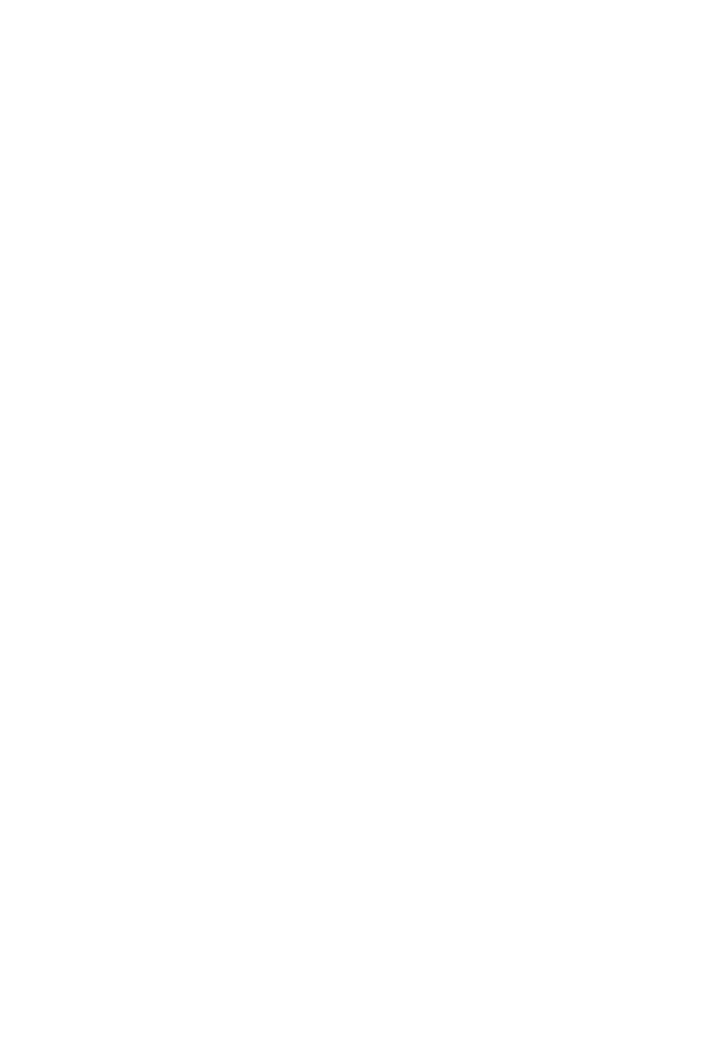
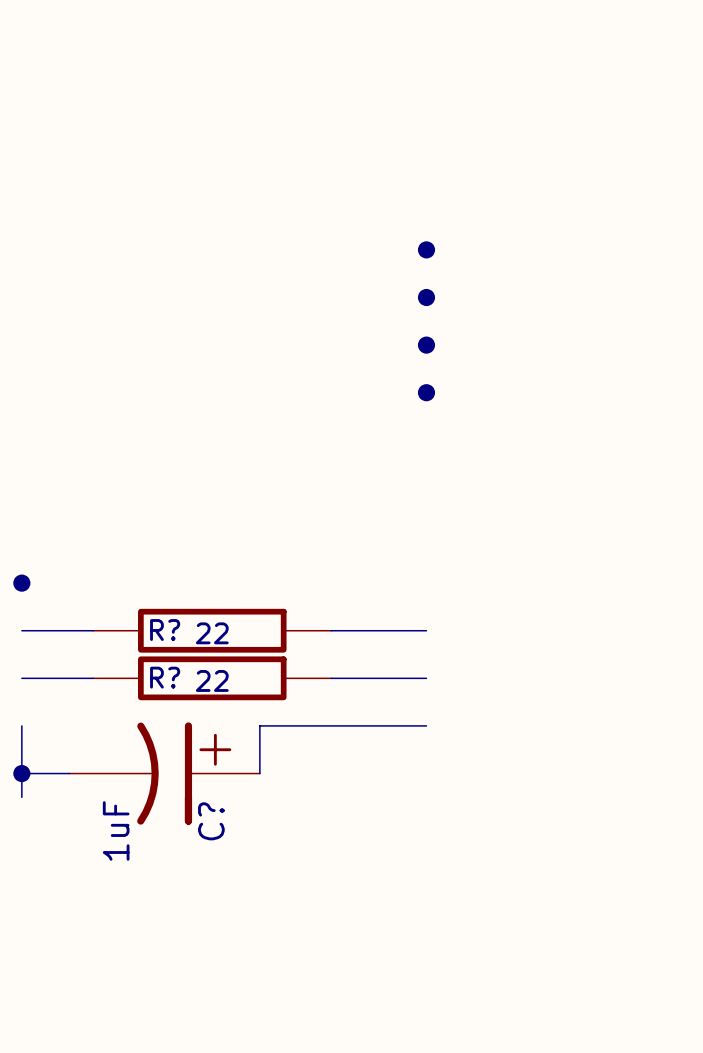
junction: none -> (426, 249)
junction: none -> (426, 297)
junction: none -> (426, 345)
junction: none -> (426, 392)
junction: none -> (21, 583)
wire: none -> (21, 630) (93, 630)
R?: none -> 22 (212, 630)
wire: none -> (331, 630) (426, 630)
wire: none -> (21, 678) (93, 678)
R?: none -> 22 (212, 678)
wire: none -> (331, 678) (426, 678)
wire: none -> (21, 725) (21, 797)
wire: none -> (426, 725) (259, 725) (259, 773)
wire: none -> (21, 773) (69, 773)
junction: none -> (21, 773)
C?: none -> 1uF (164, 773)

